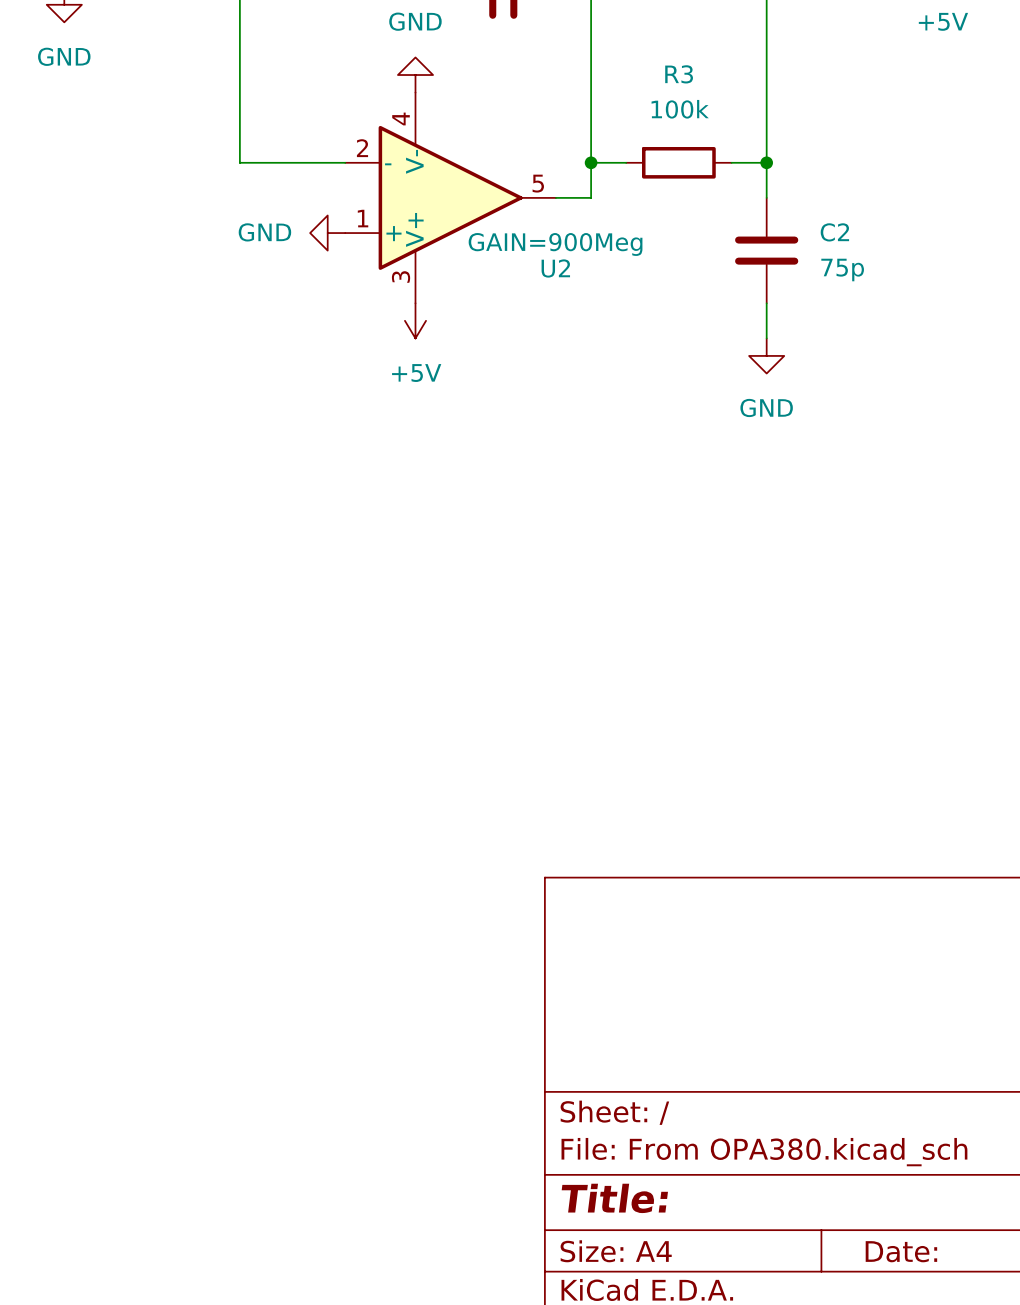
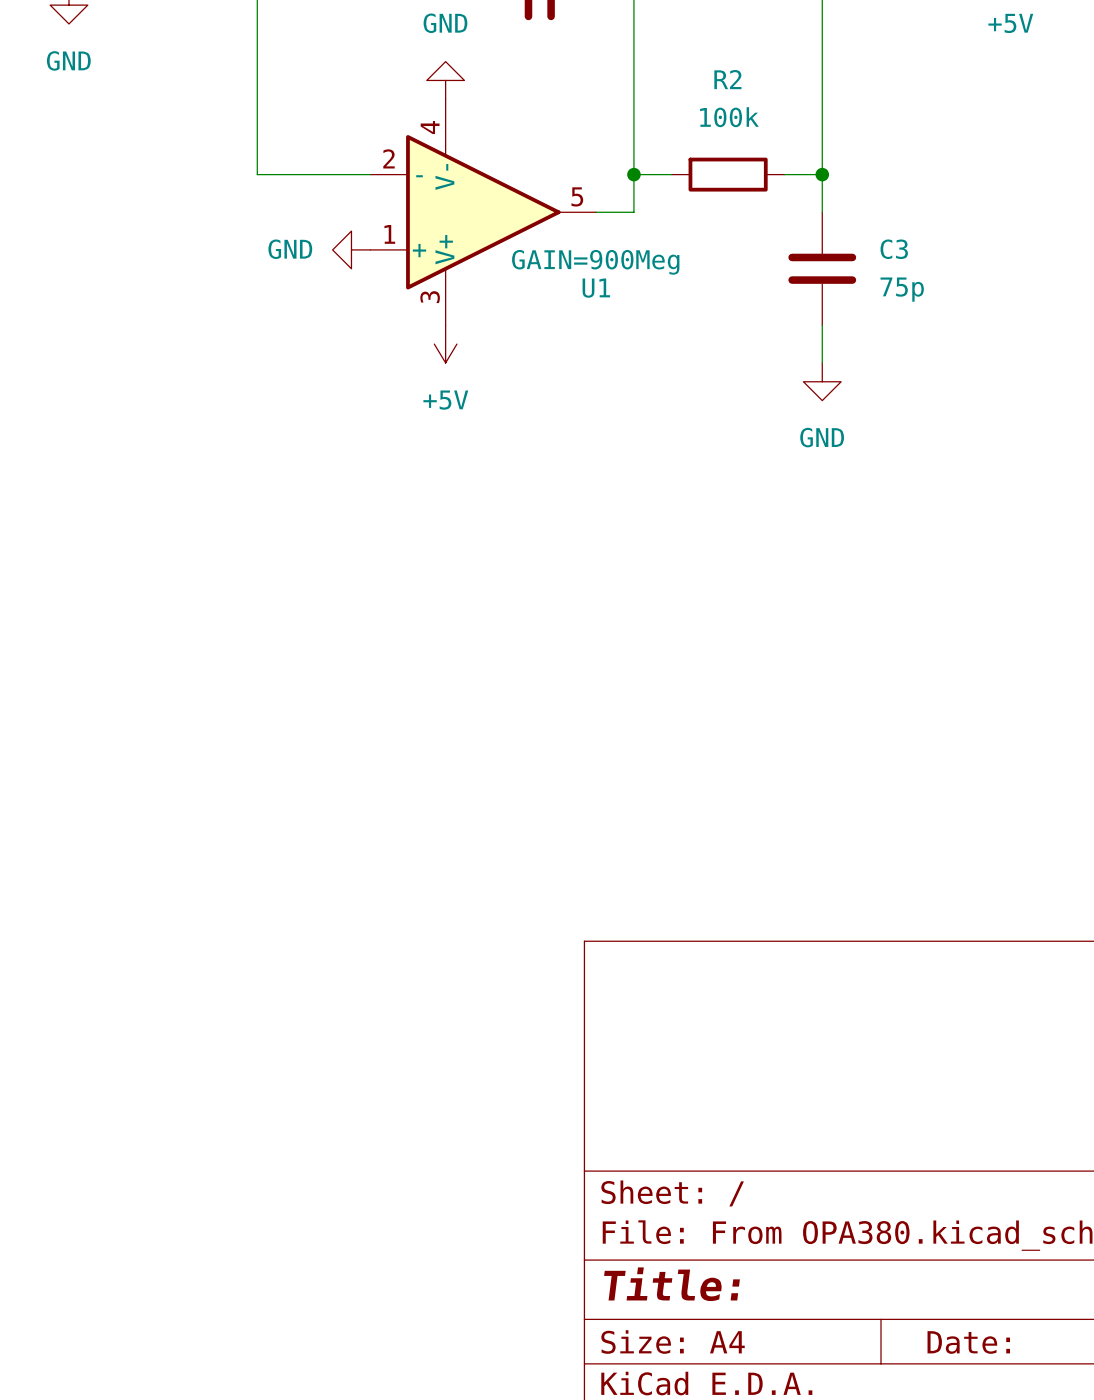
R3 name: R3 (679, 74) -> R2 (727, 79)
C2 name: C2 (834, 232) -> C3 (894, 249)
U2 name: U2 (555, 268) -> U1 (596, 288)

